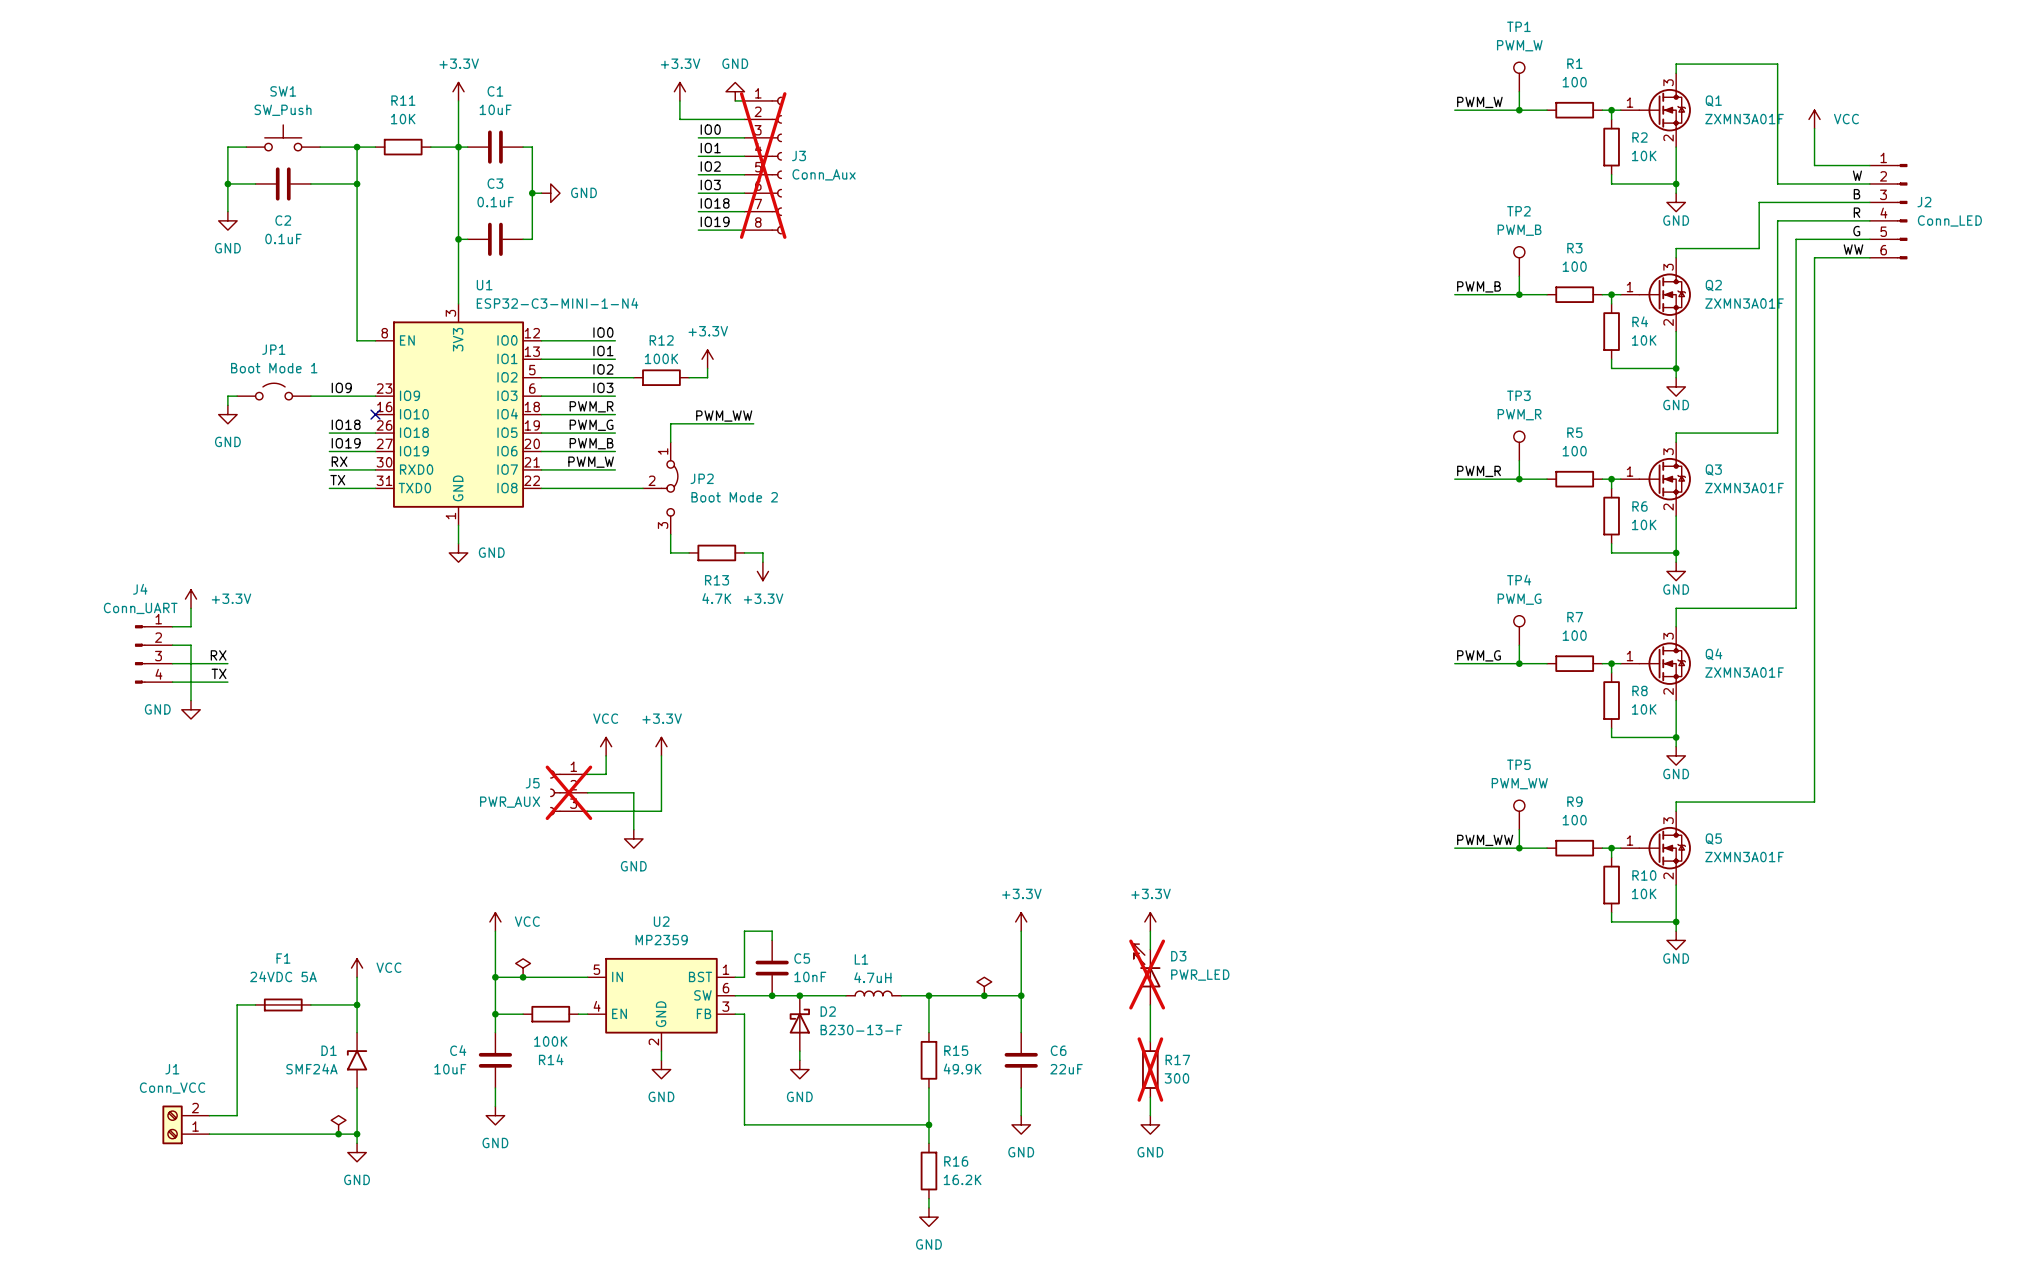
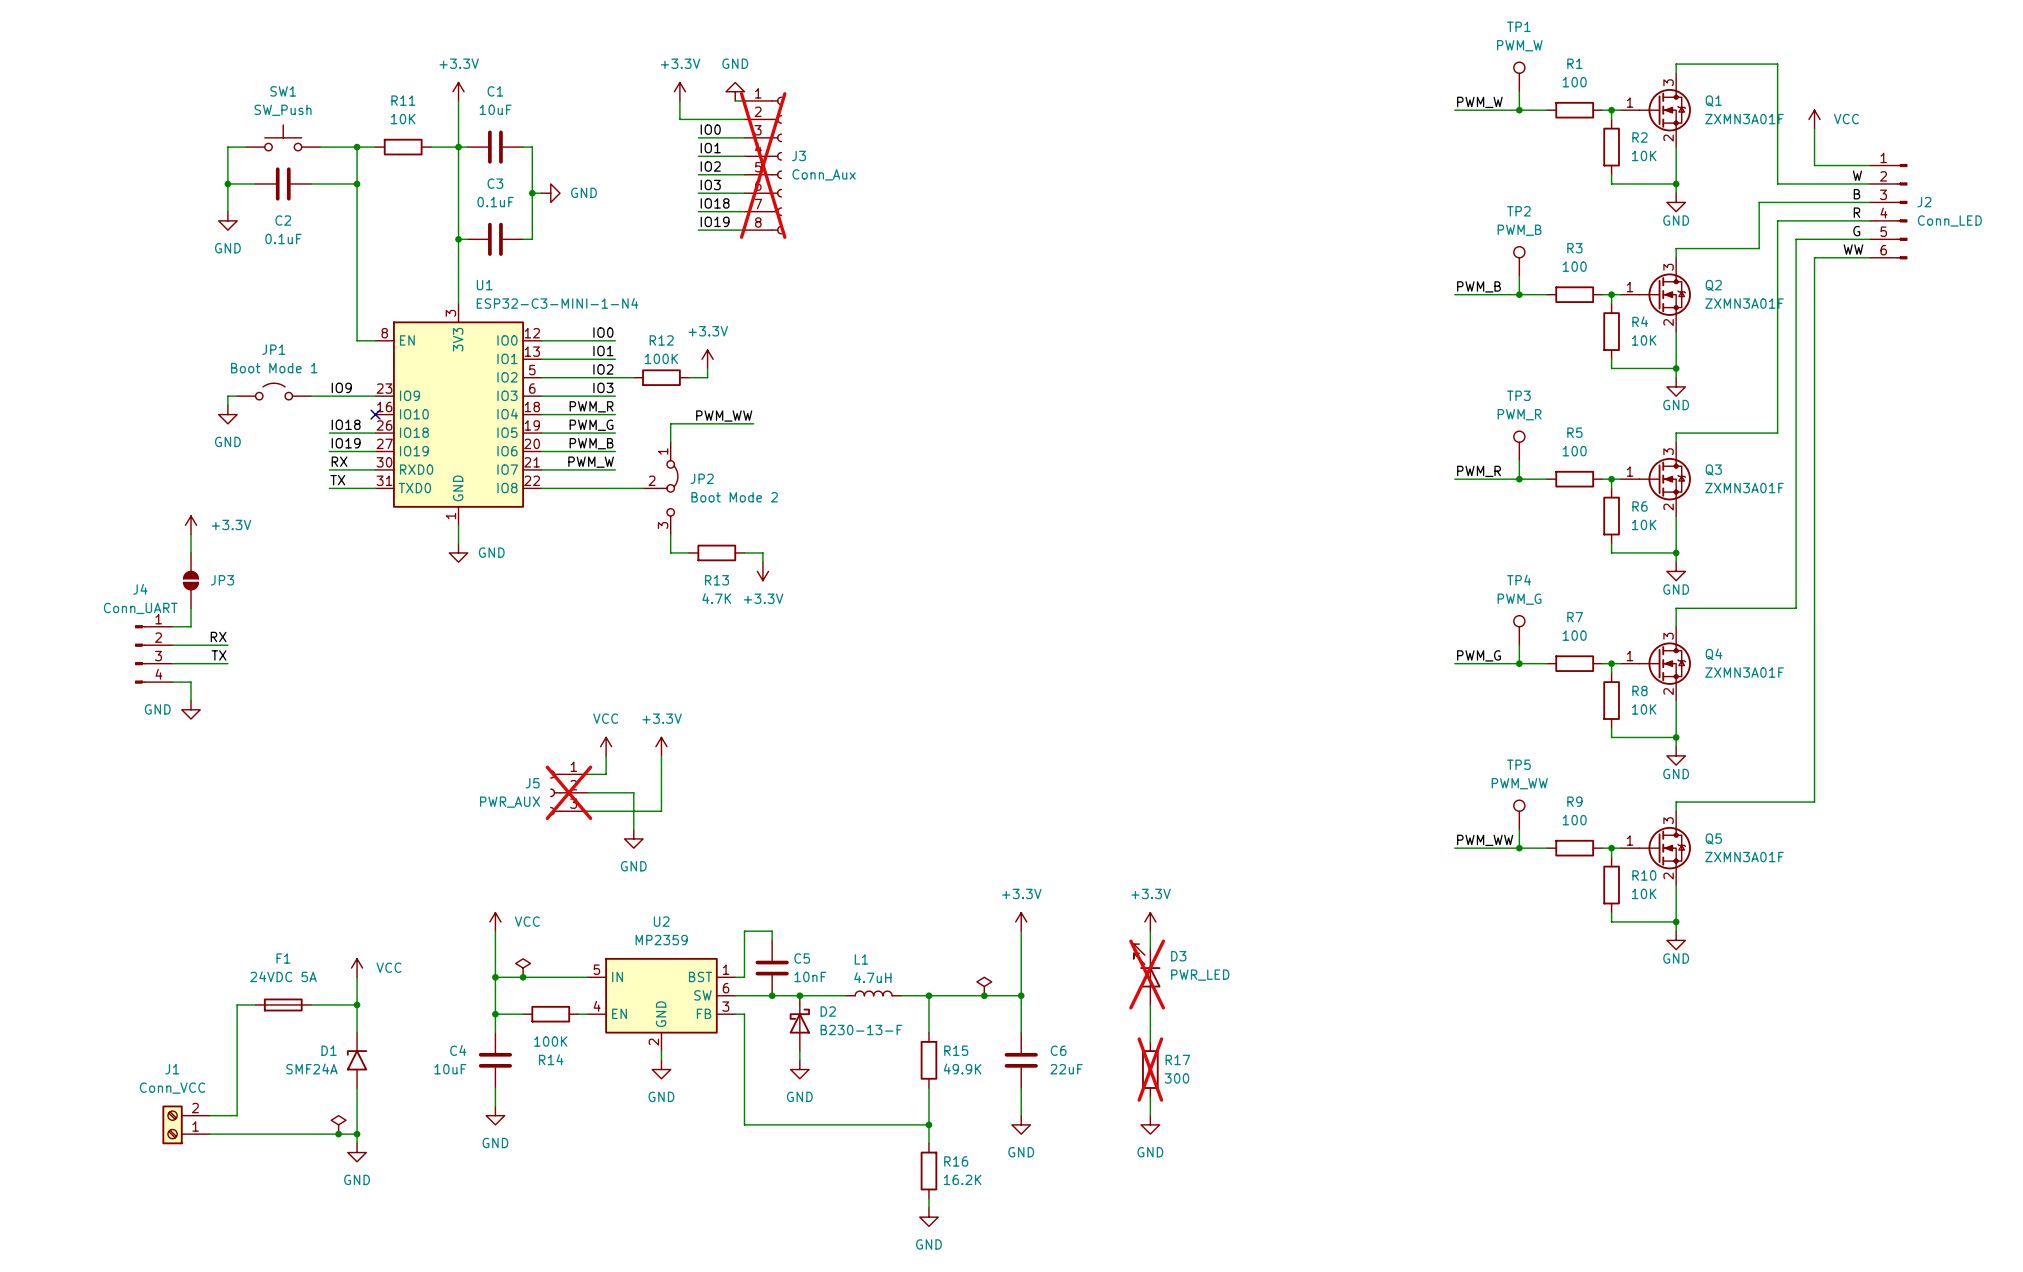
wire: none -> (191, 534) (191, 552)
JP3: none -> (191, 580)
power symbol position: +3.3V (191, 599) -> +3.3V (191, 525)
label: none -> RX (218, 636)
wire: (191, 645) (191, 682) (227, 682) -> (191, 645) (227, 645)
label: RX (218, 655) -> TX (219, 655)
label: TX (219, 673) -> none

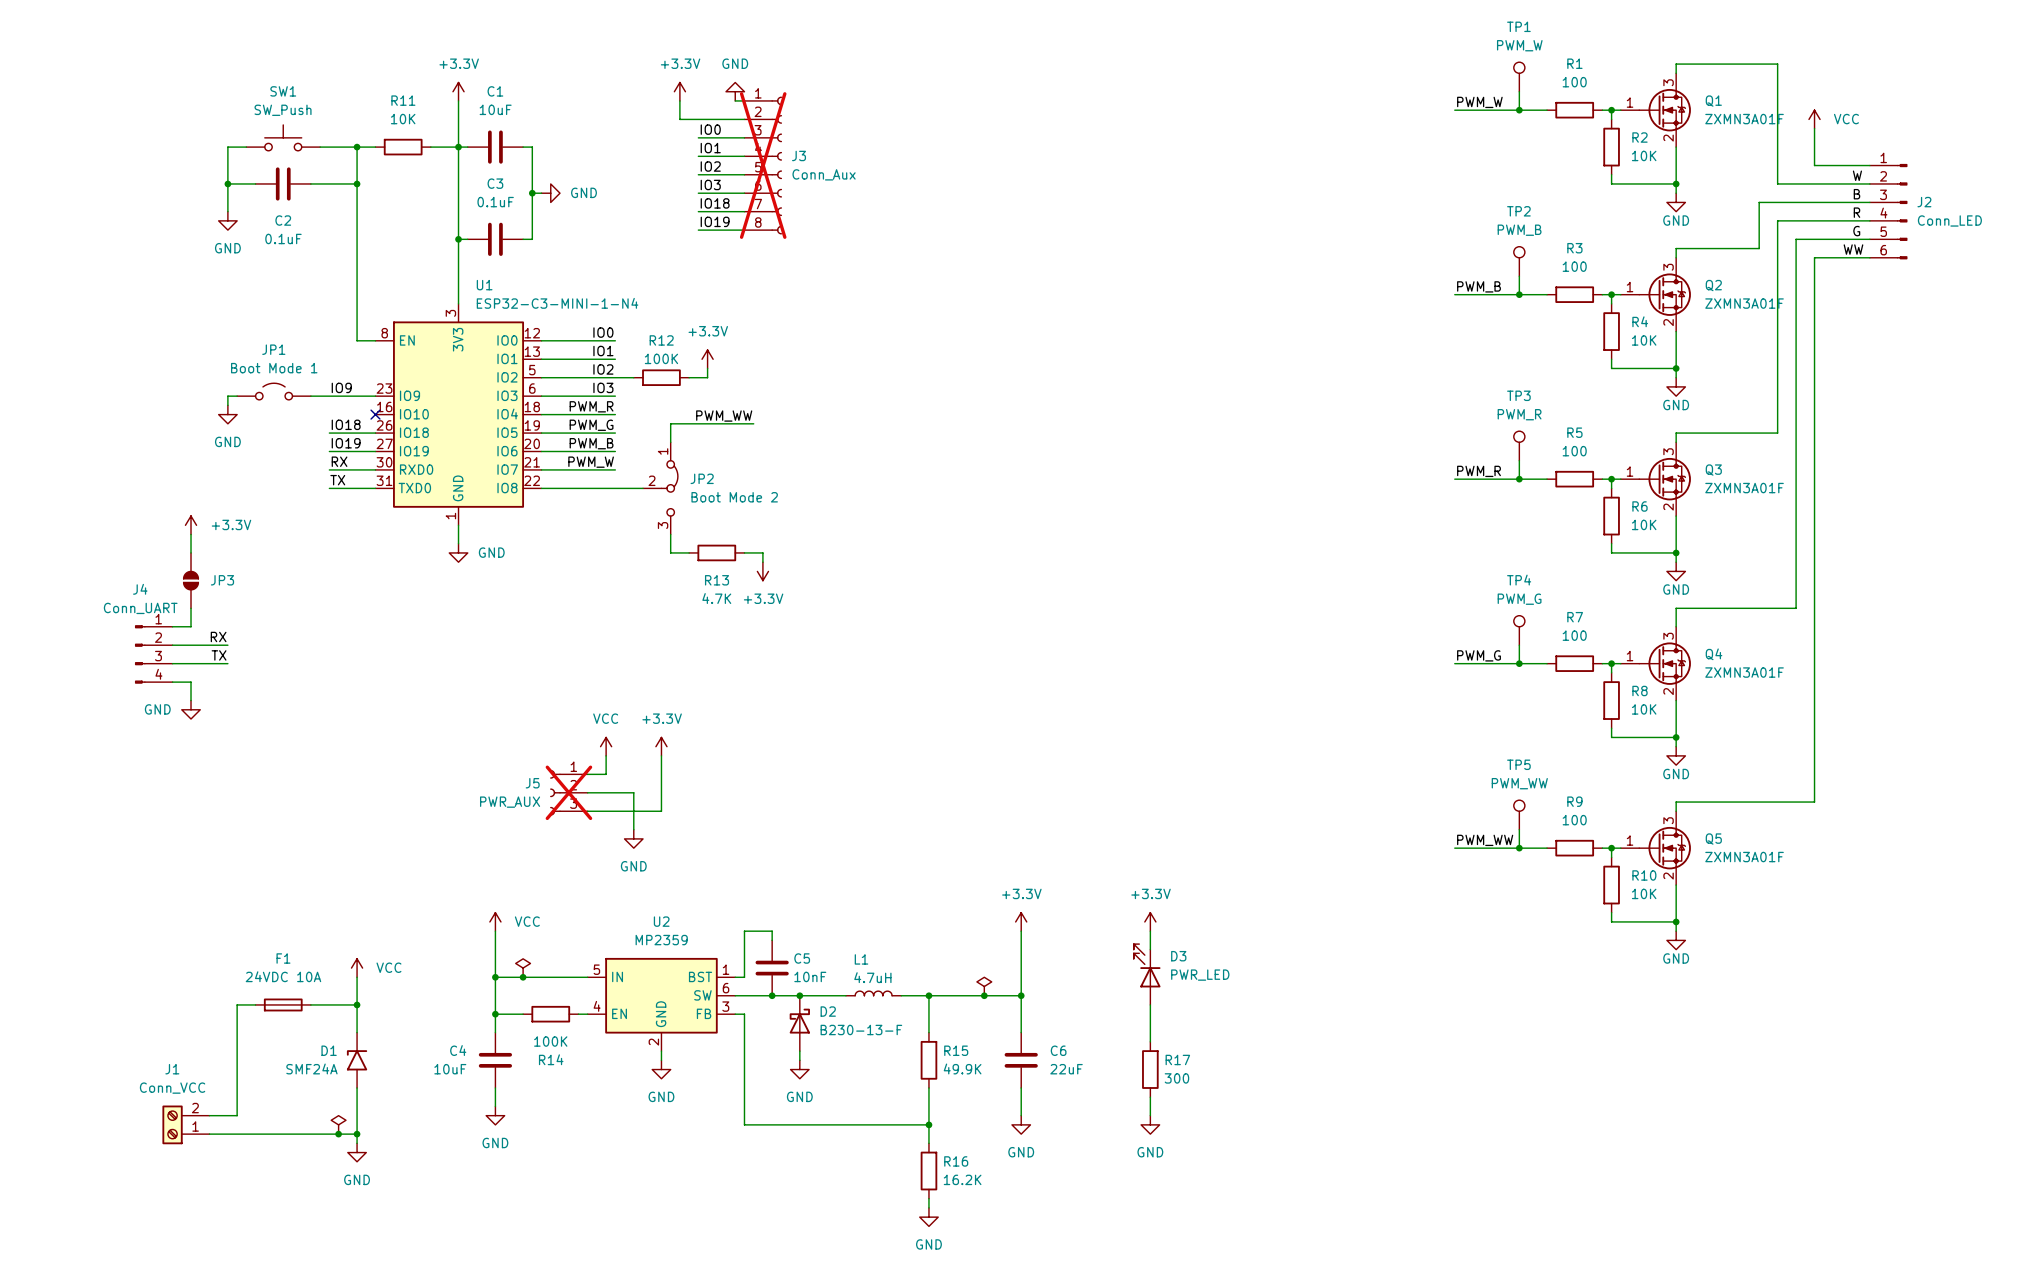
D3 do-not-place cross: (1147, 974) -> none
F1 value: 24VDC 5A (283, 976) -> 24VDC 10A (283, 976)
R17 do-not-place cross: (1150, 1069) -> none

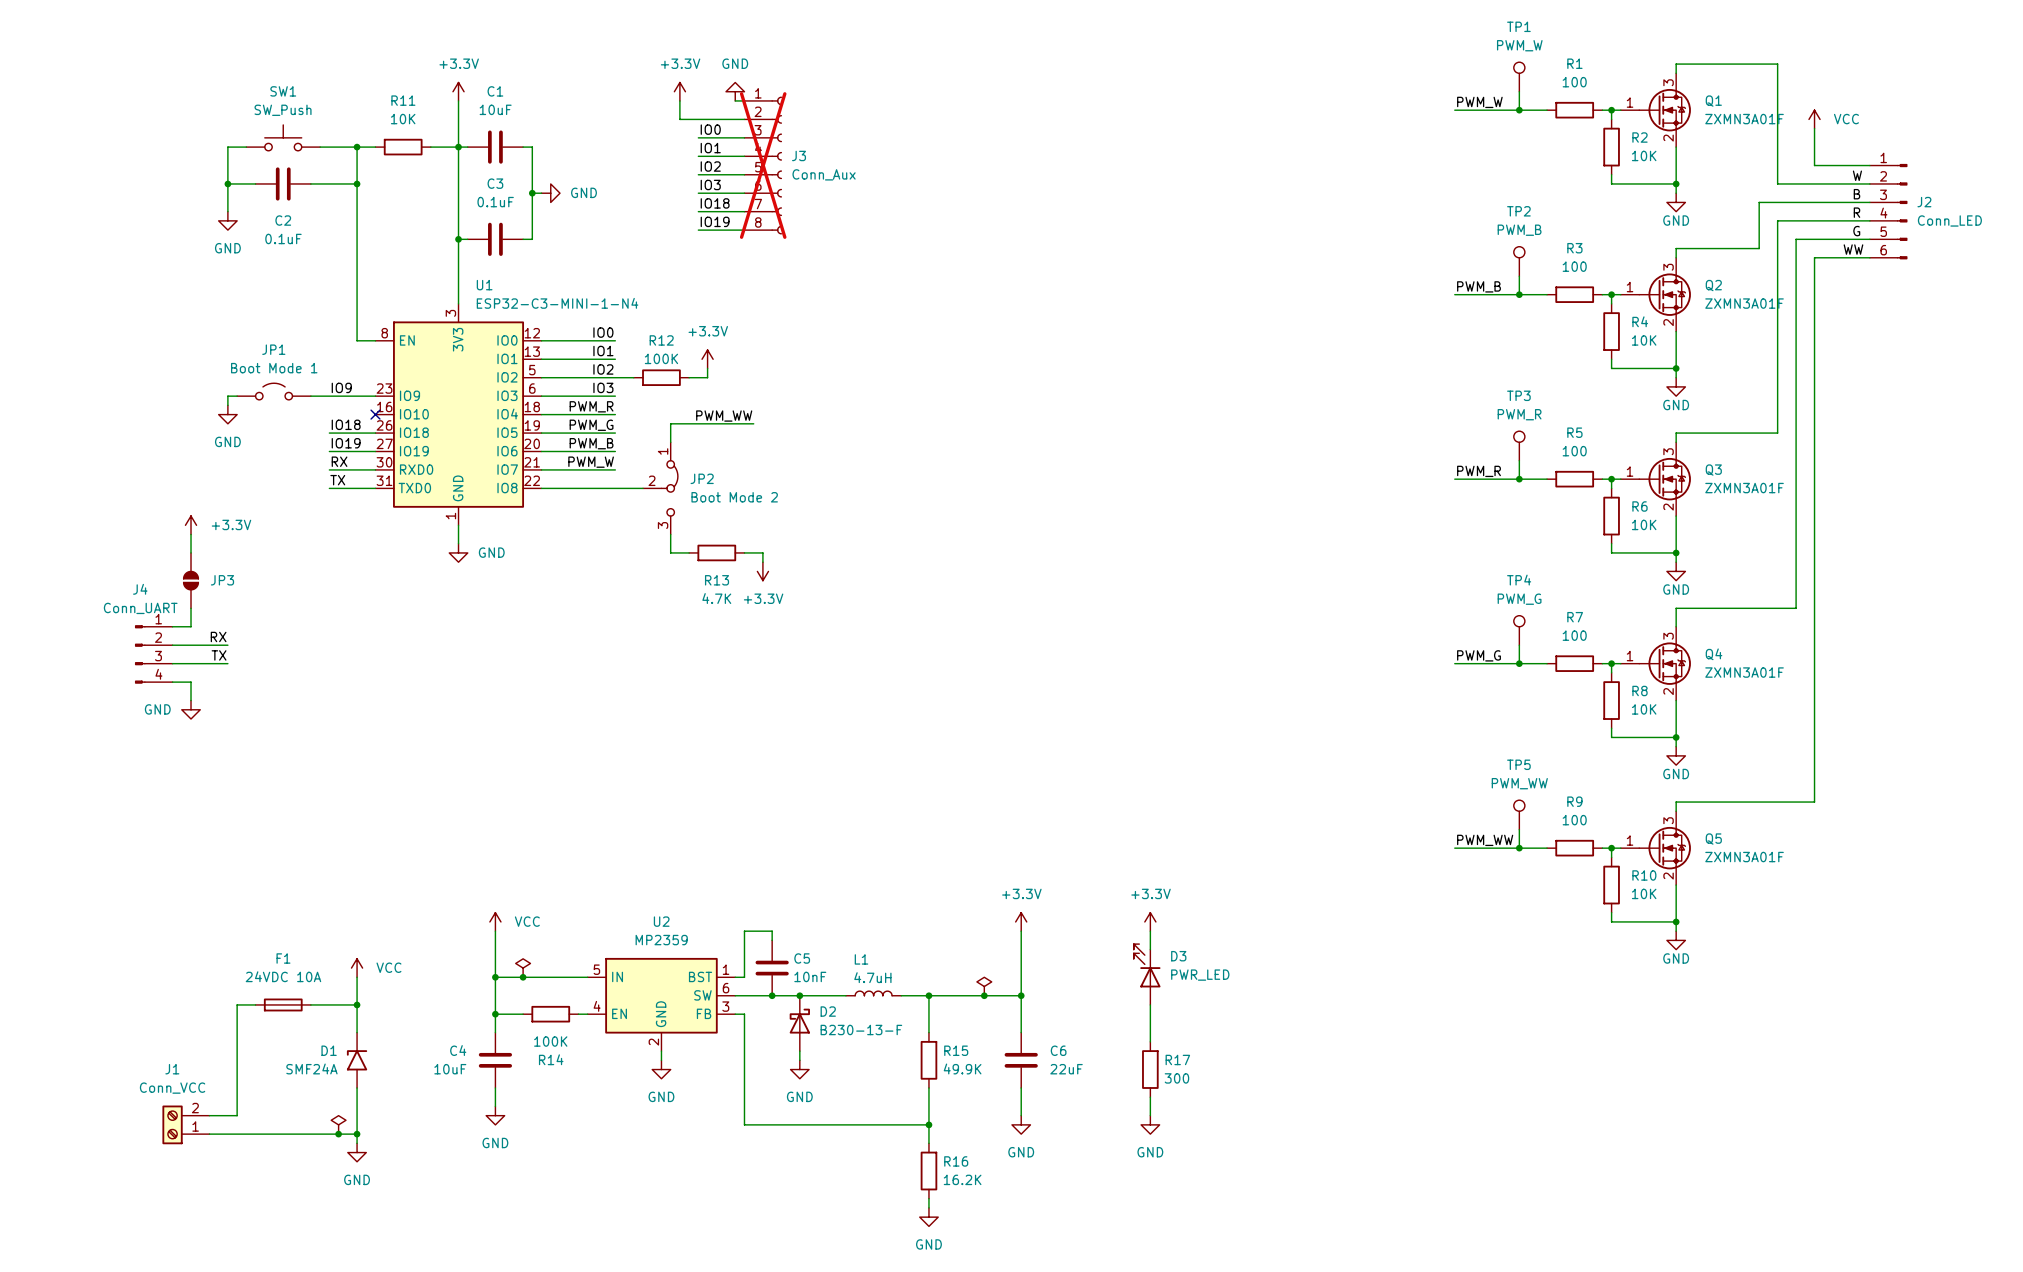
power symbol: VCC (606, 746) -> none
power symbol: +3.3V (661, 746) -> none
wire: (606, 755) (606, 774) (587, 774) -> none
wire: (661, 755) (661, 811) (587, 811) -> none
J5: PWR_AUX (568, 792) -> none
wire: (587, 792) (633, 792) (633, 829) -> none
power symbol: GND (633, 838) -> none

